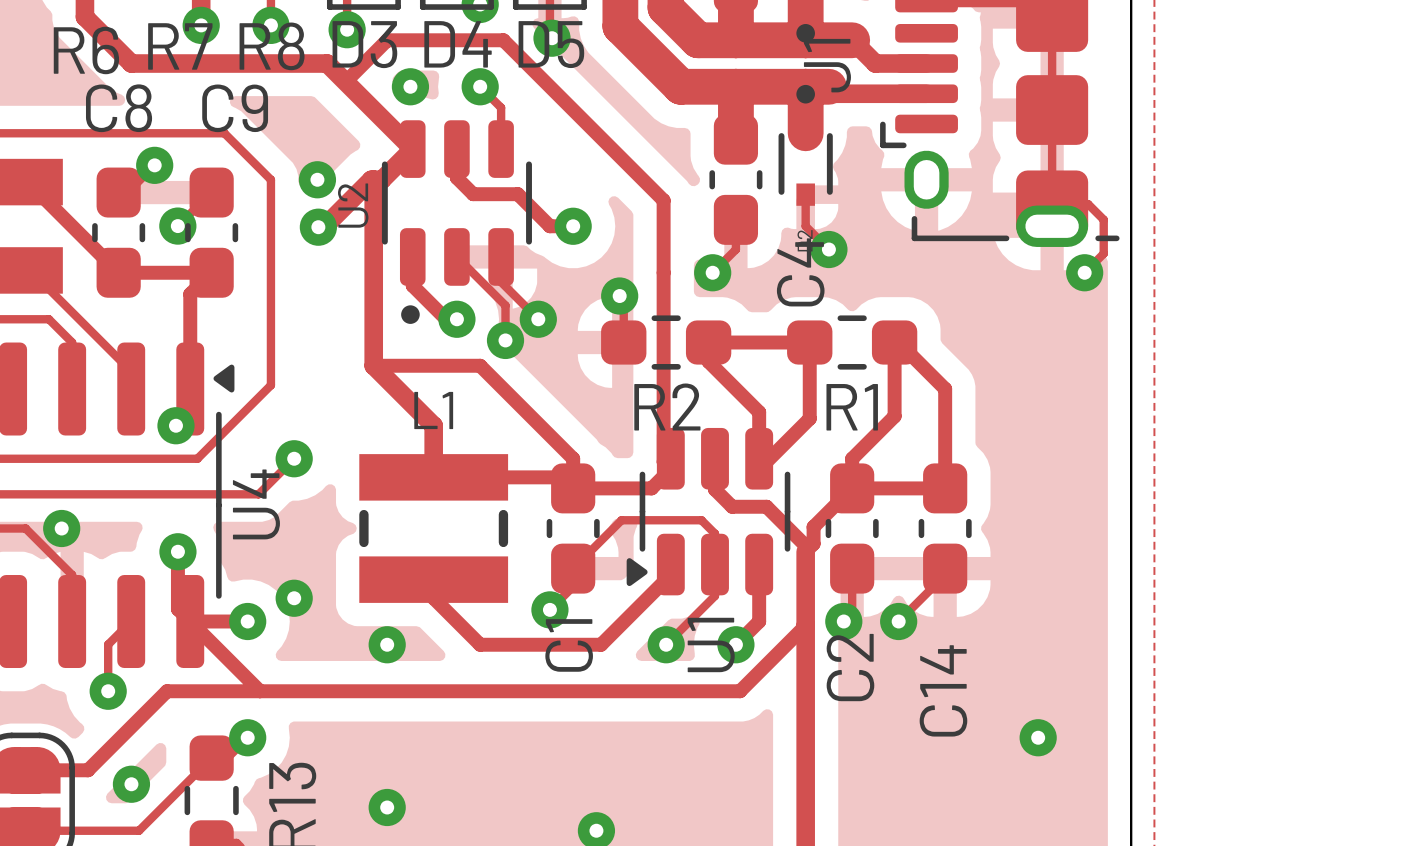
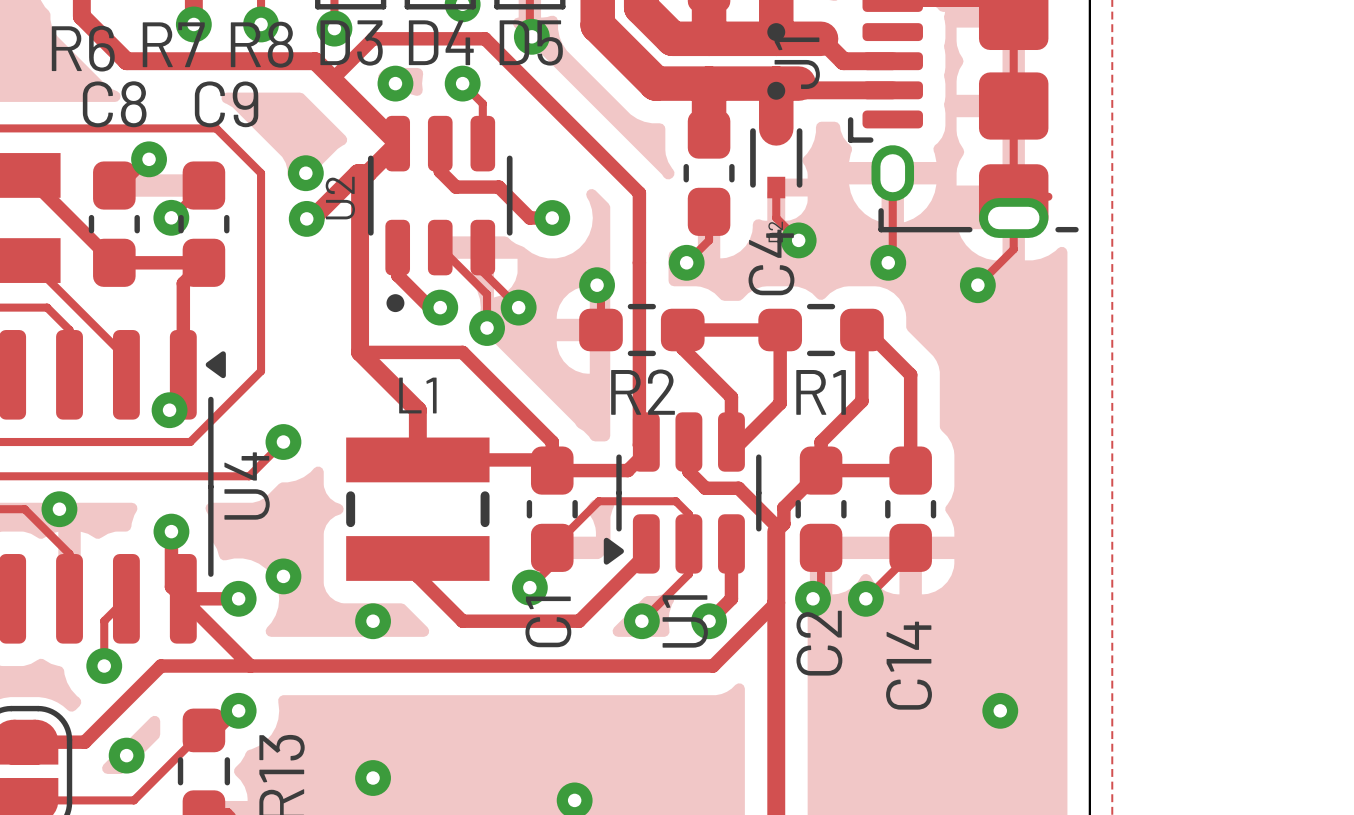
track: none -> (892, 173) (892, 258) (888, 262)
track: (1088, 204) (1103, 219) (1103, 253) (1084, 272) -> none
track: none -> (1013, 218) (1013, 249) (977, 285)
via: none -> (888, 262)
via position: (1084, 272) -> (977, 285)

